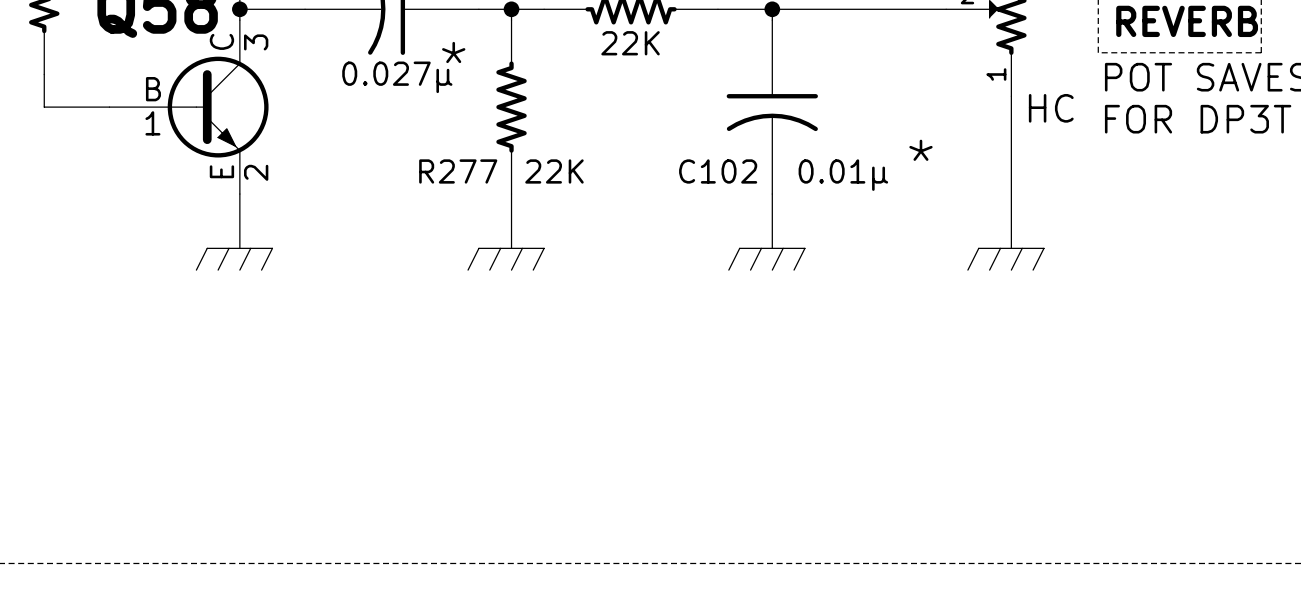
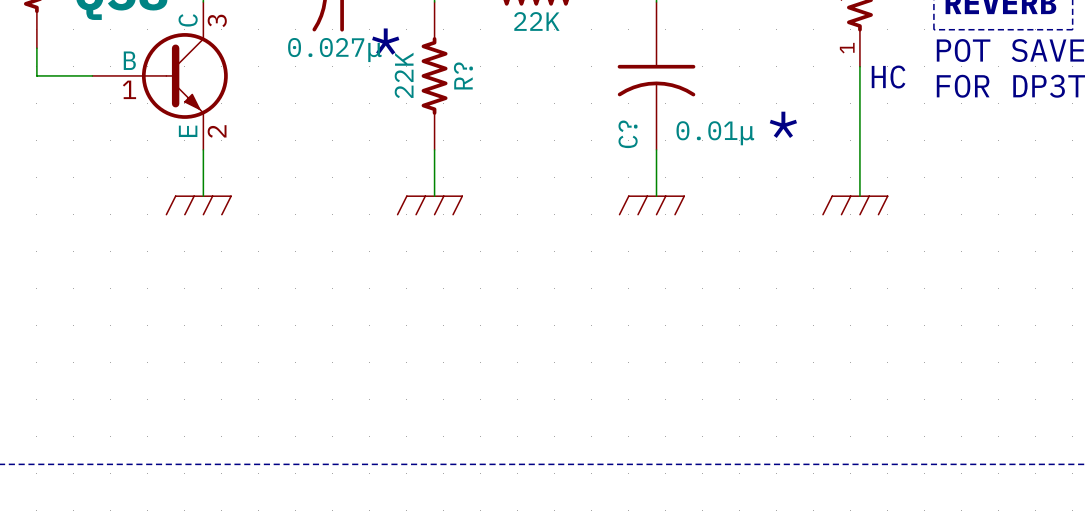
R277 name: R277 (458, 171) -> R? (463, 75)
R277 value rotation: 0° (554, 171) -> 90° counterclockwise (404, 75)
R277 value position: 22K (554, 171) -> 22K (404, 75)
C102 name: C102 (718, 171) -> C? (628, 134)

